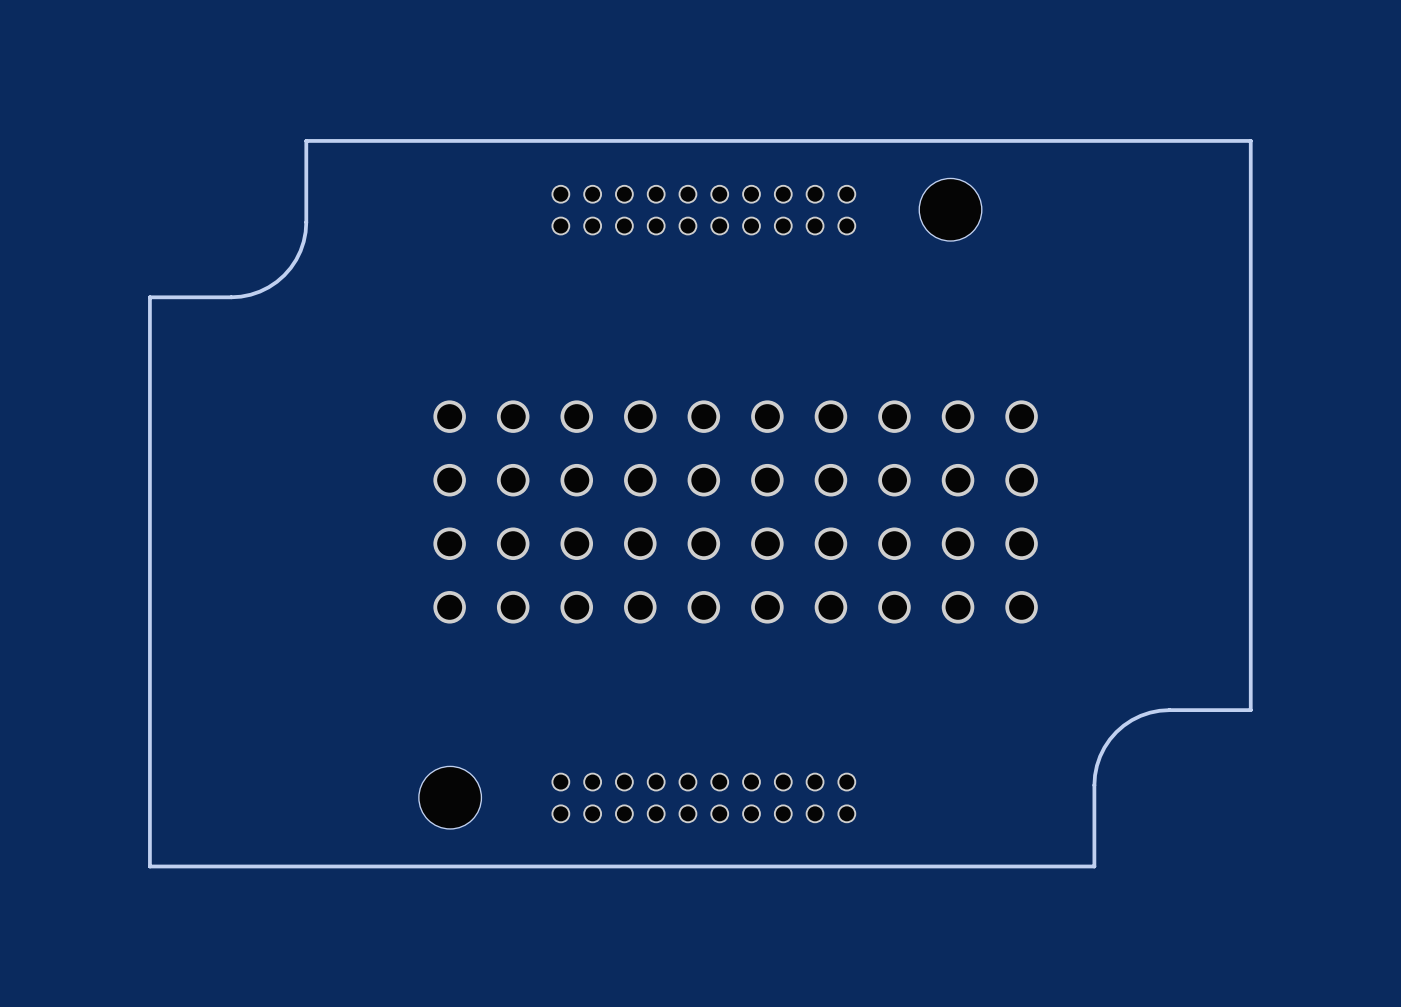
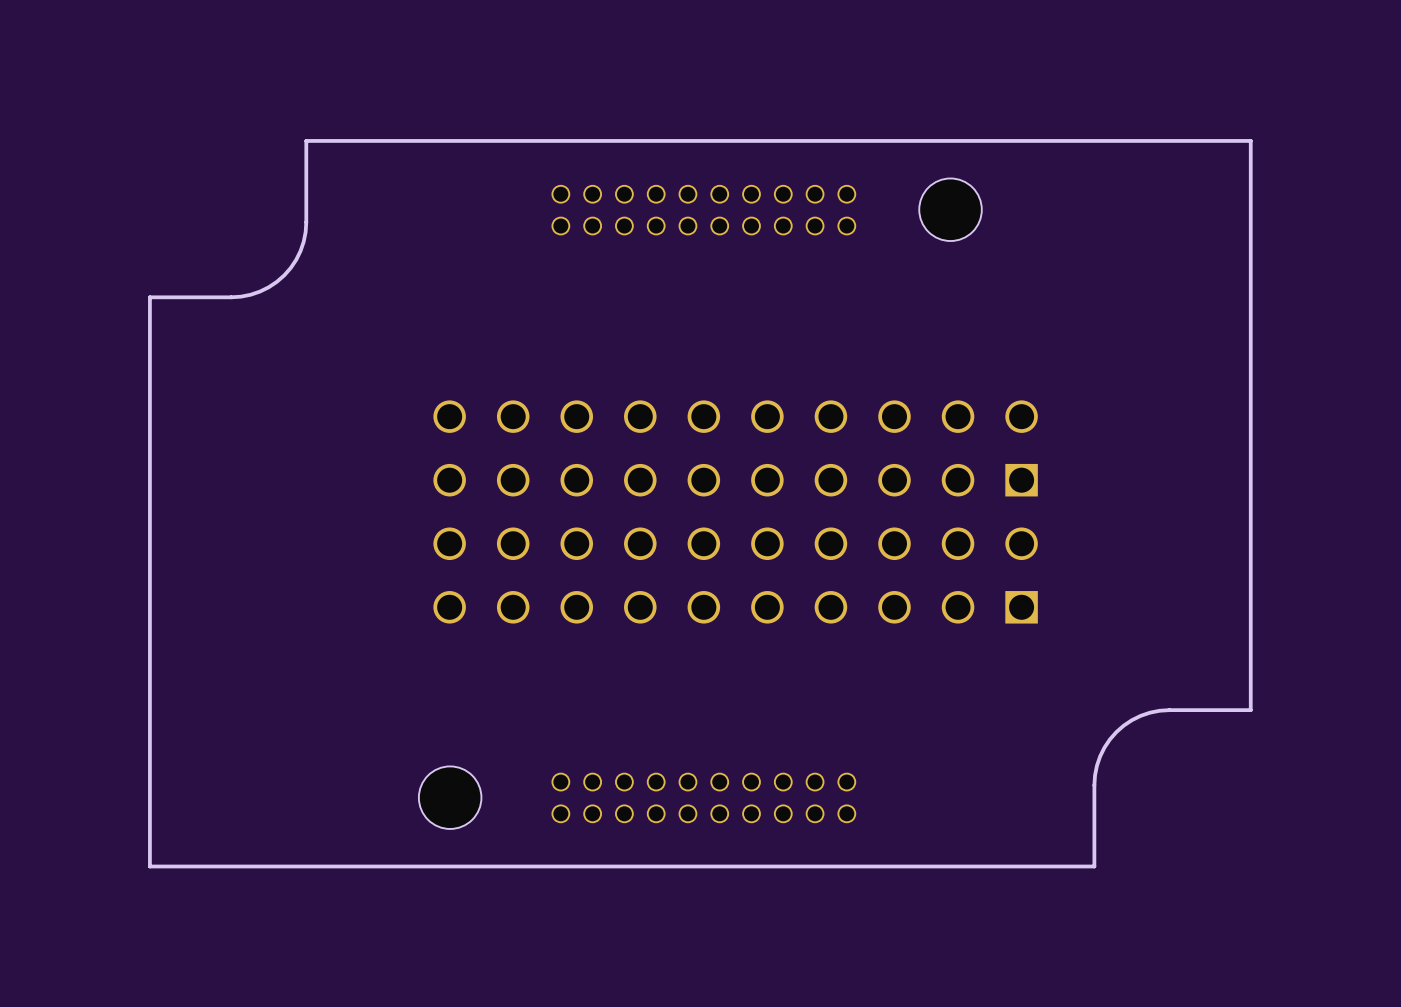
part footprint: [433, 400, 1038, 497] -> [433, 400, 1038, 497]
part footprint: [433, 527, 1038, 624] -> [433, 527, 1038, 624]

